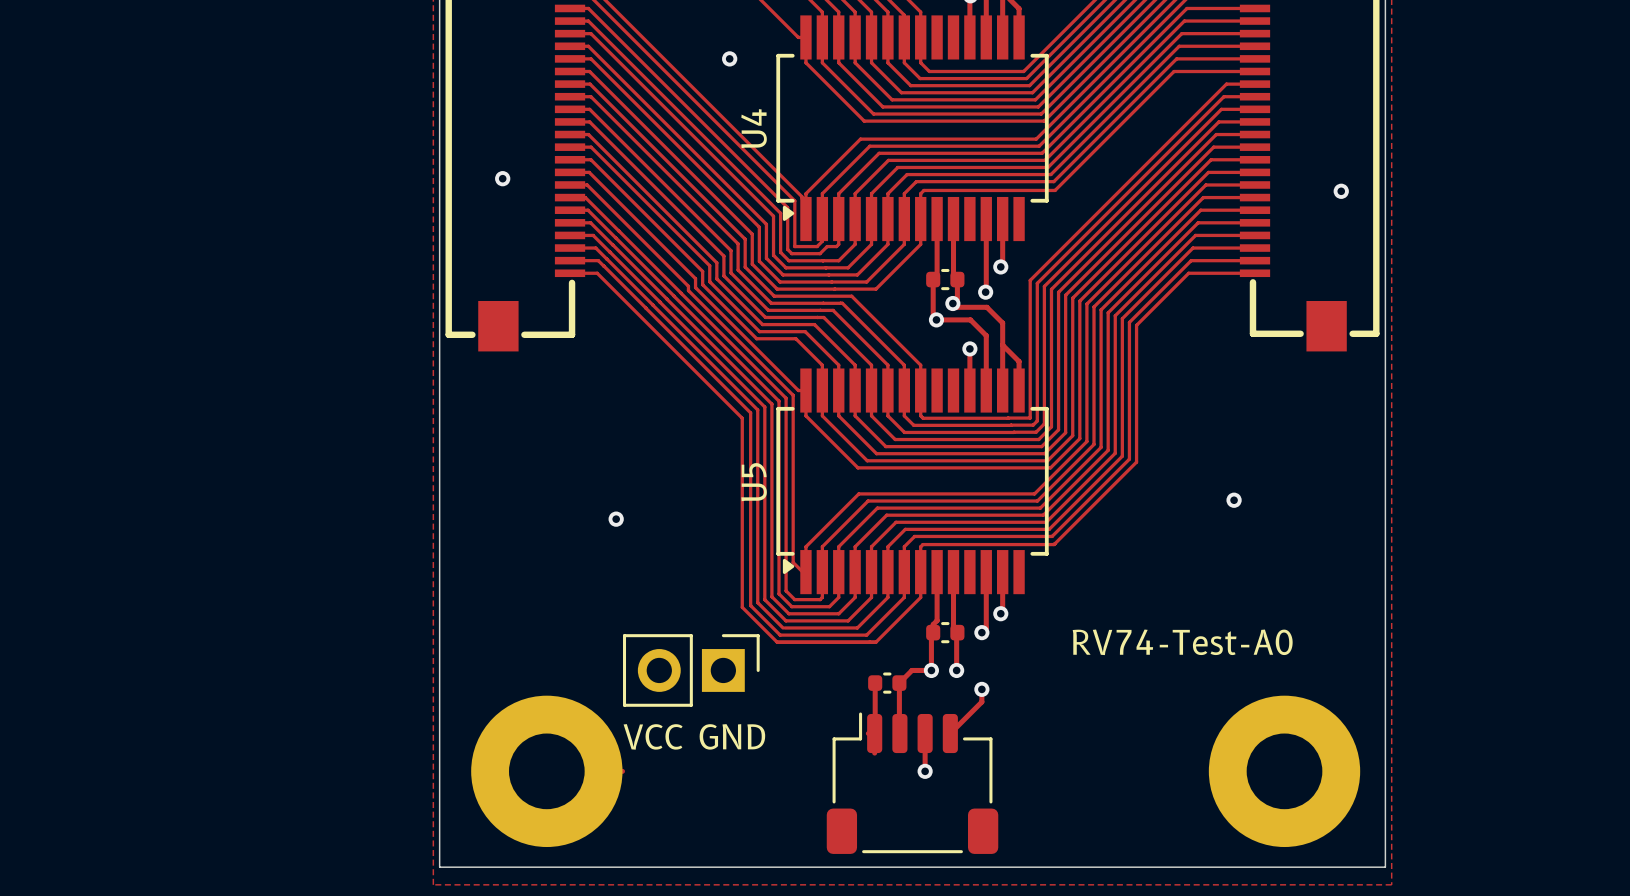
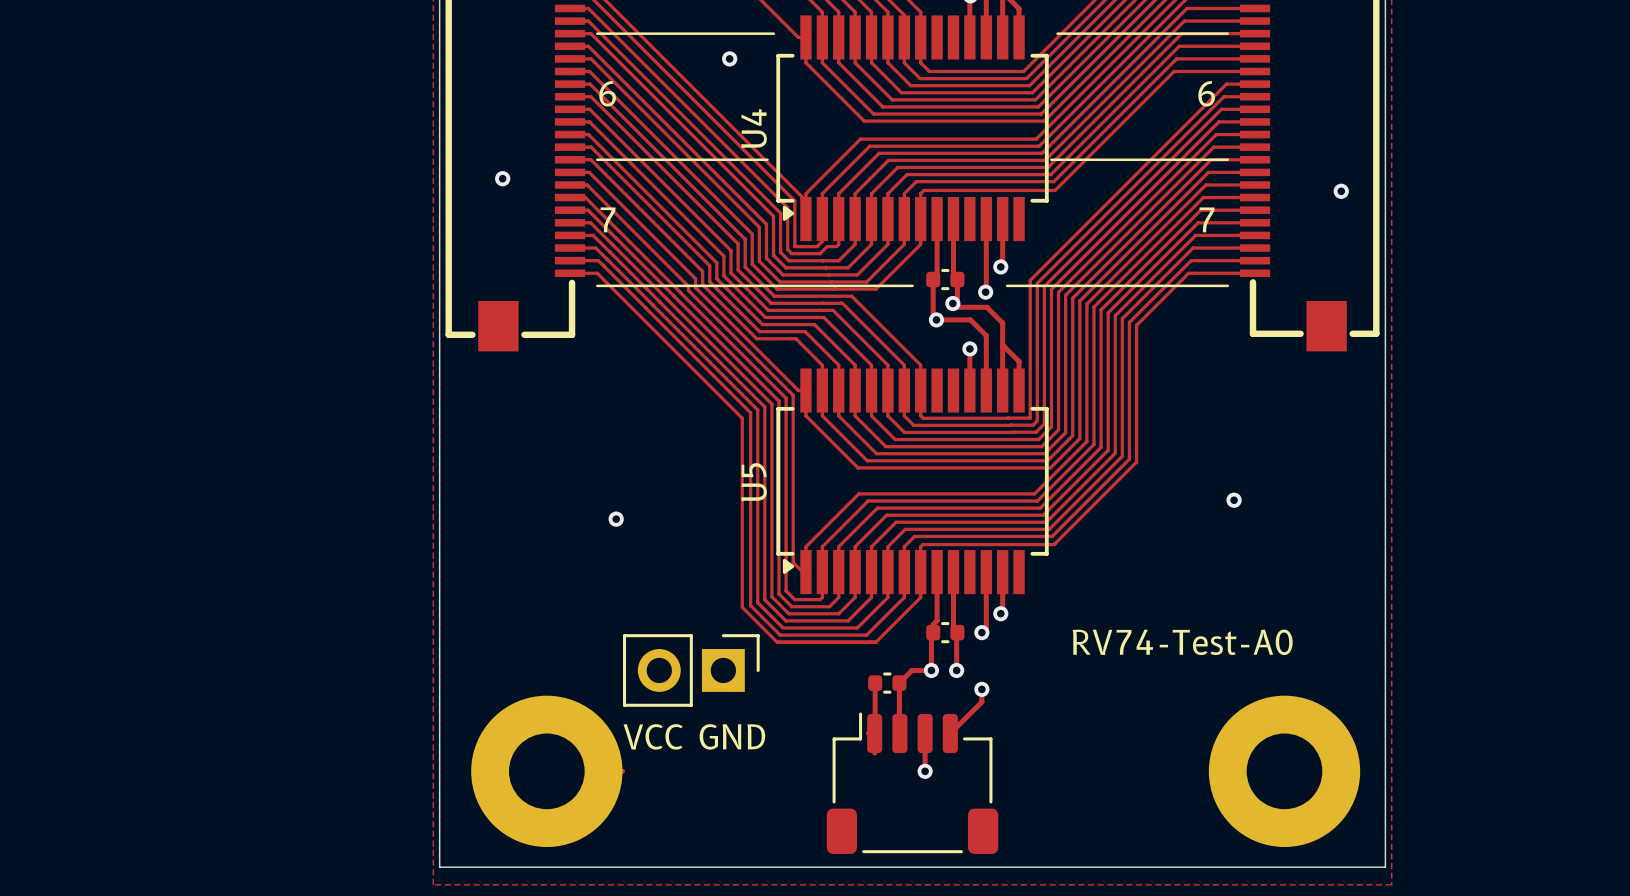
line: none -> (597, 33) (773, 33)
line: none -> (1057, 33) (1227, 33)
text: none -> 6 (607, 93)
text: none -> 6 (1206, 93)
line: none -> (597, 159) (767, 159)
line: none -> (1051, 159) (1227, 159)
text: none -> 7 (608, 219)
text: none -> 7 (1207, 219)
line: none -> (597, 285) (912, 285)
line: none -> (1007, 285) (1227, 285)

